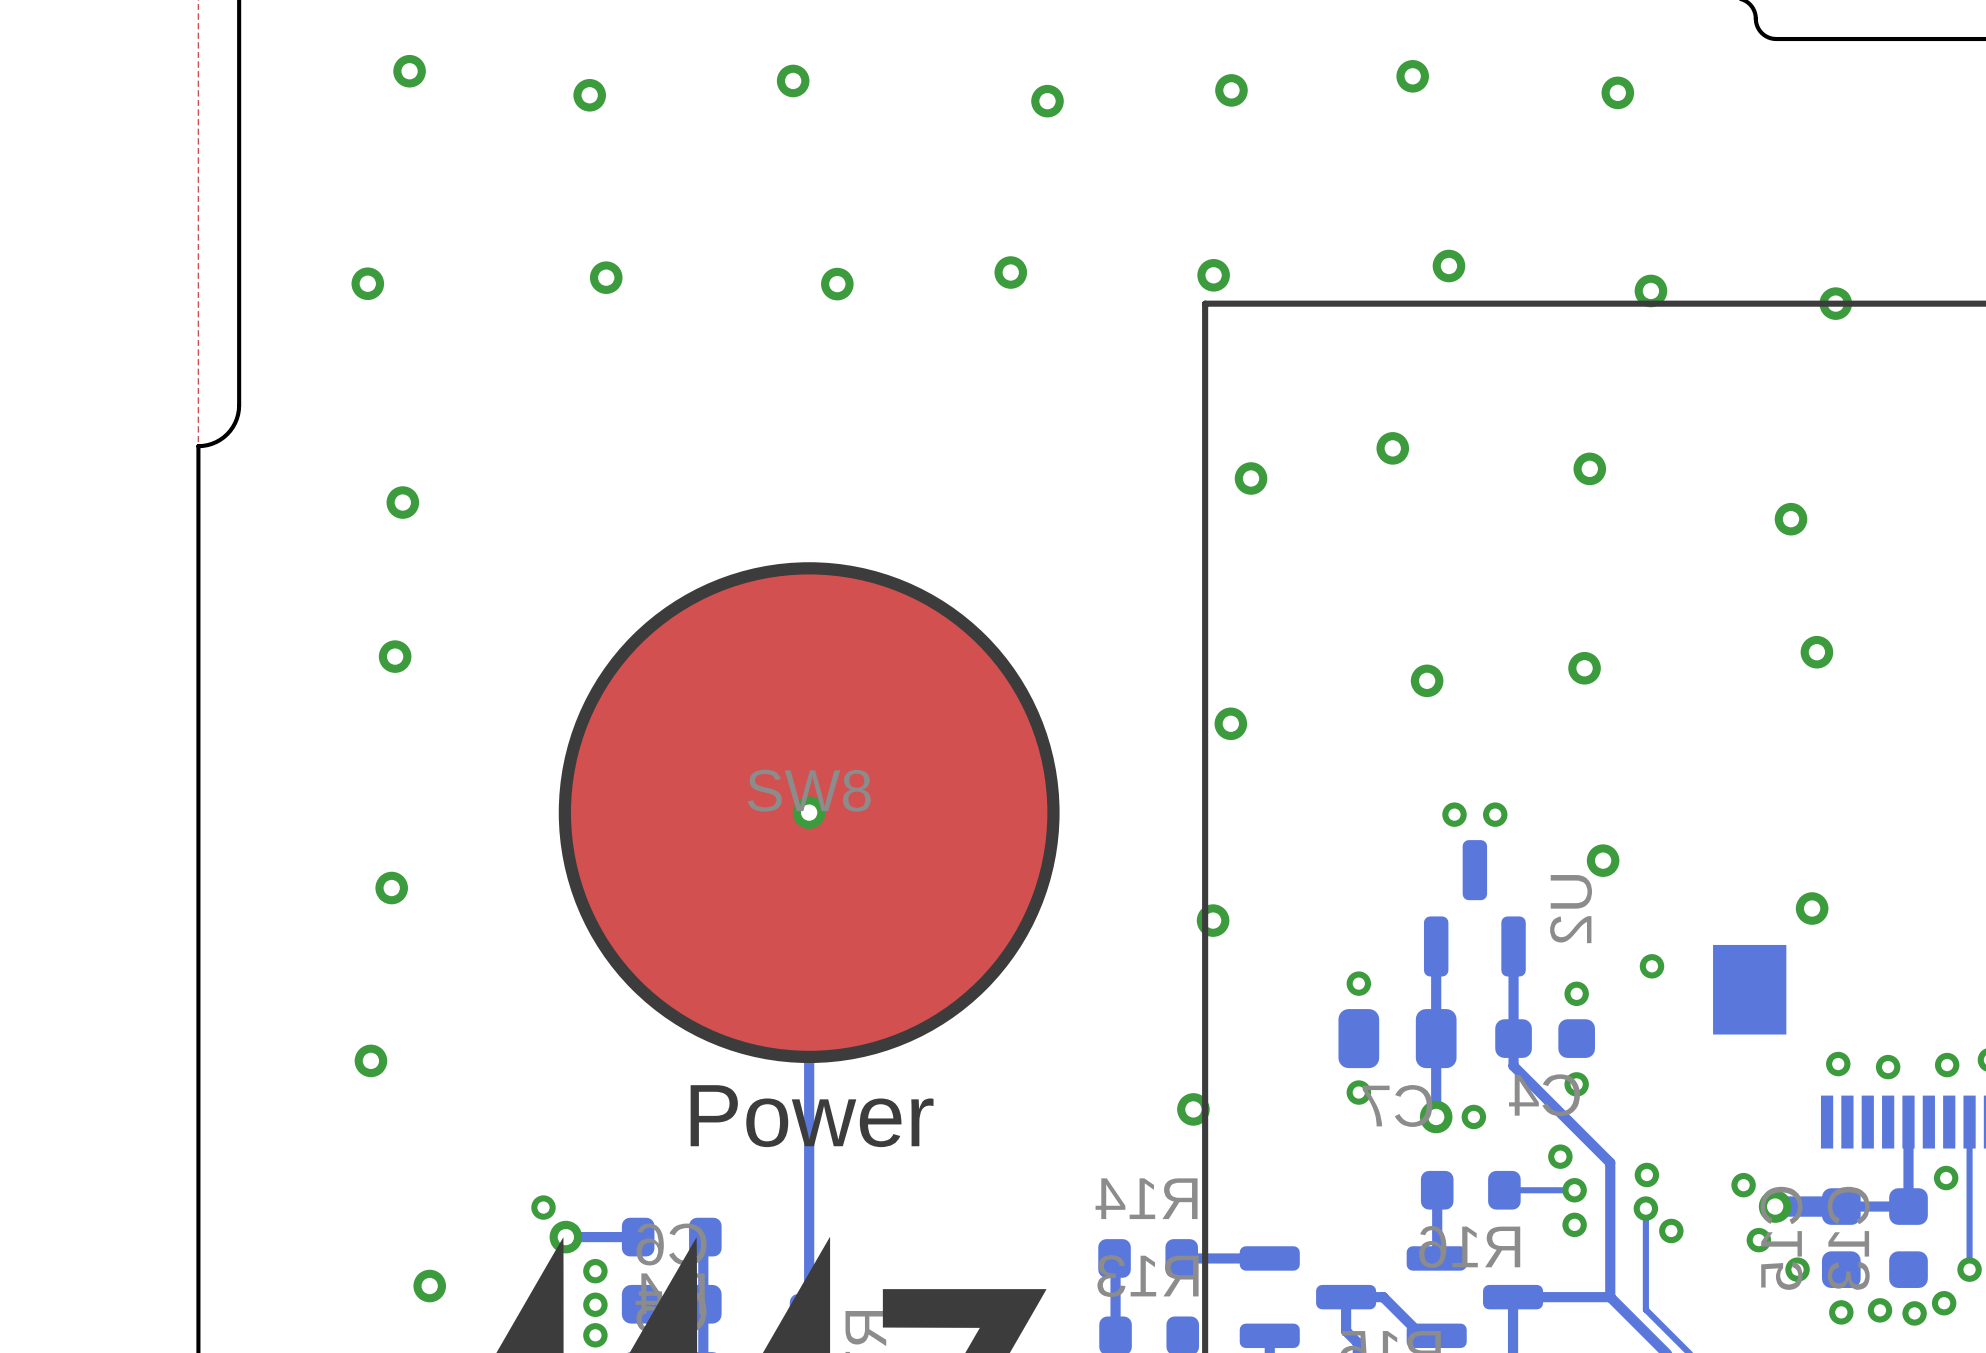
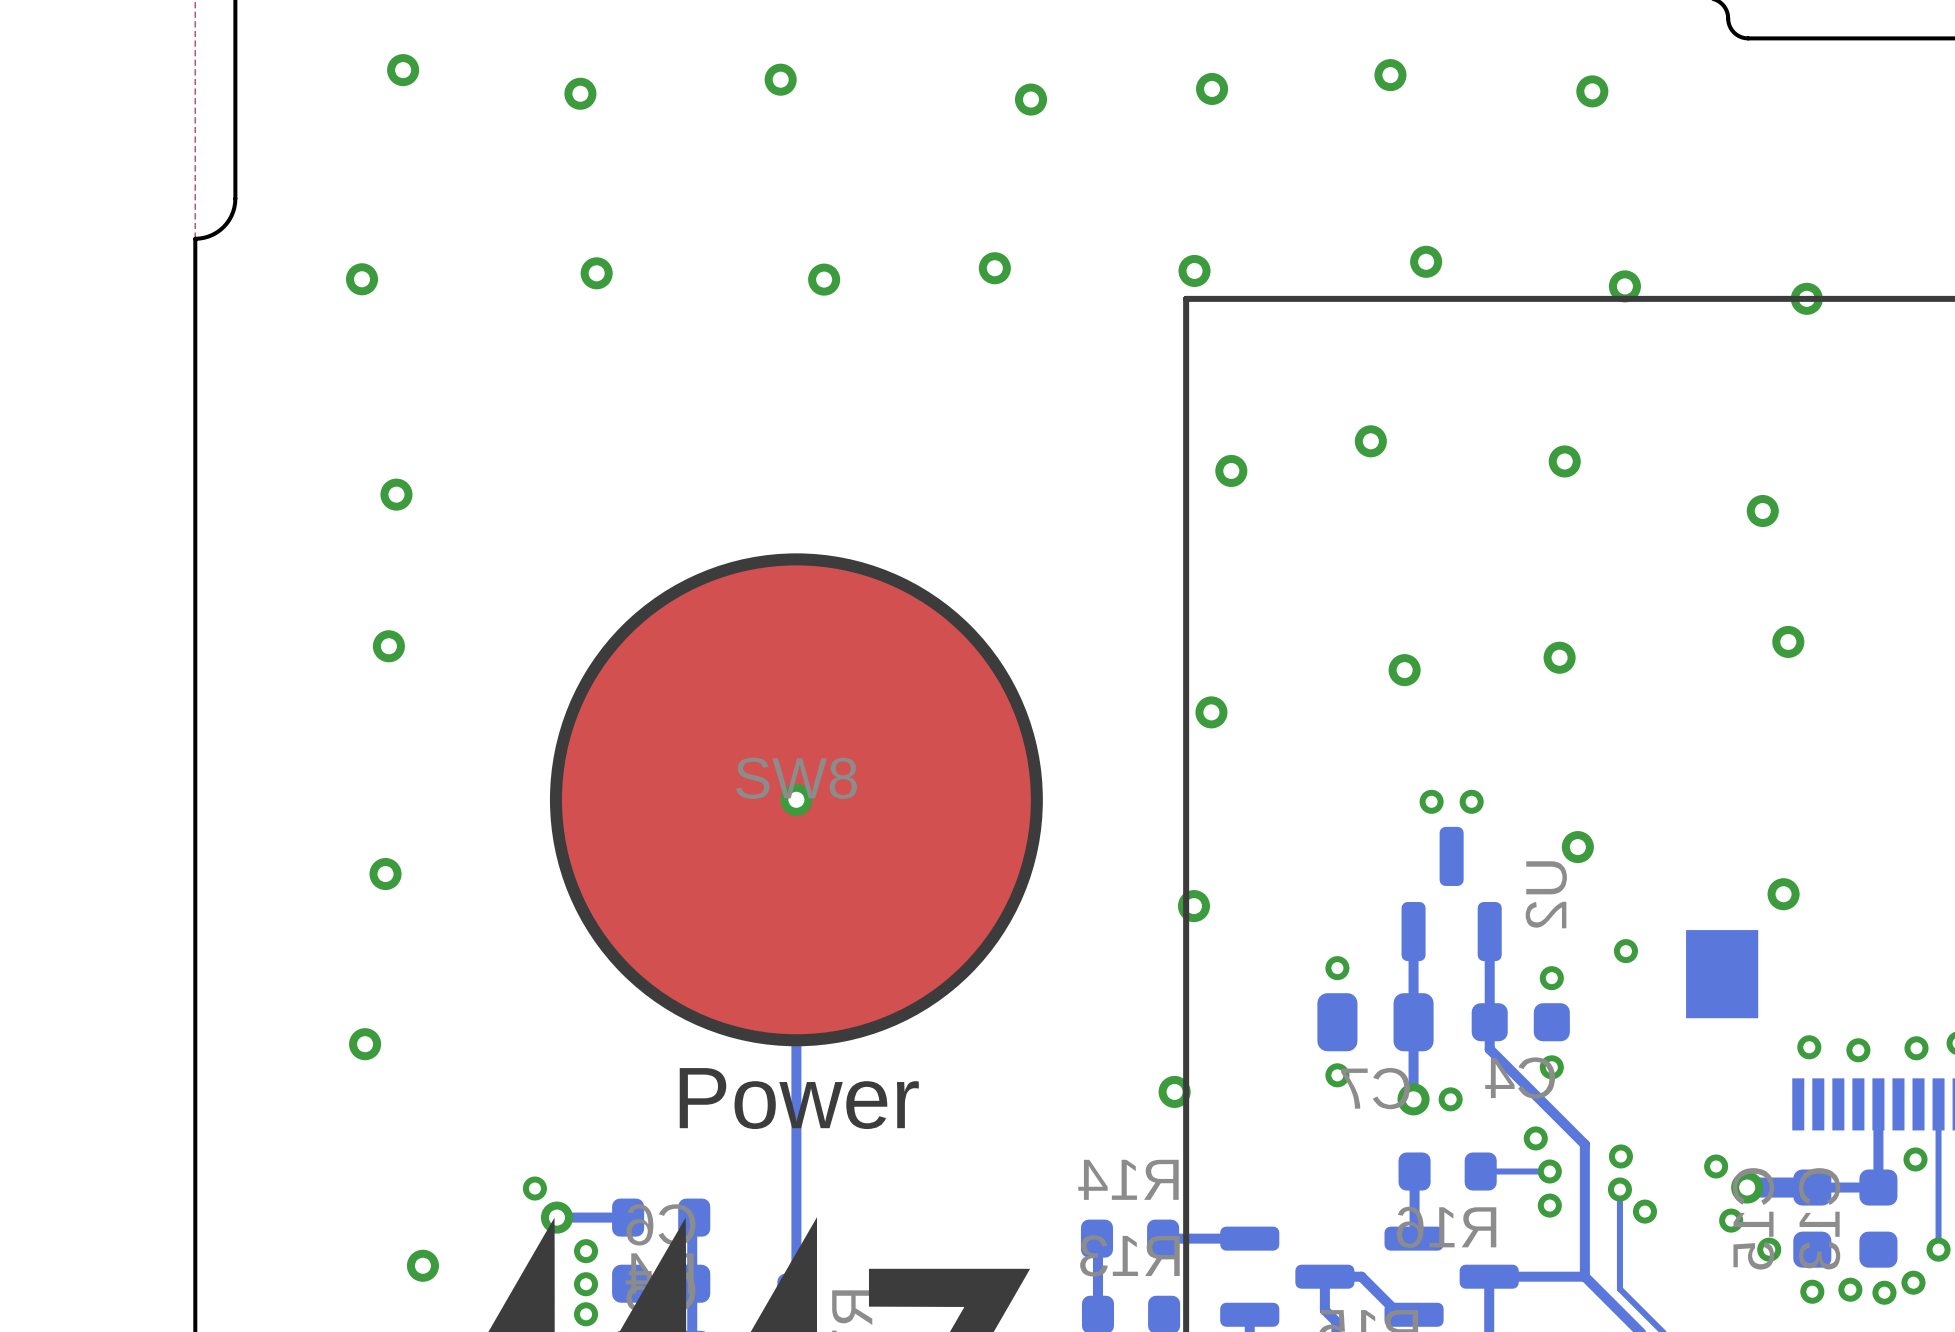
board edge: (239, 201) (238, 410) (235, 423) (227, 434) (216, 442) (198, 446) -> (235, 198) (231, 216) (223, 227) (208, 236) (195, 238) (195, 439)

